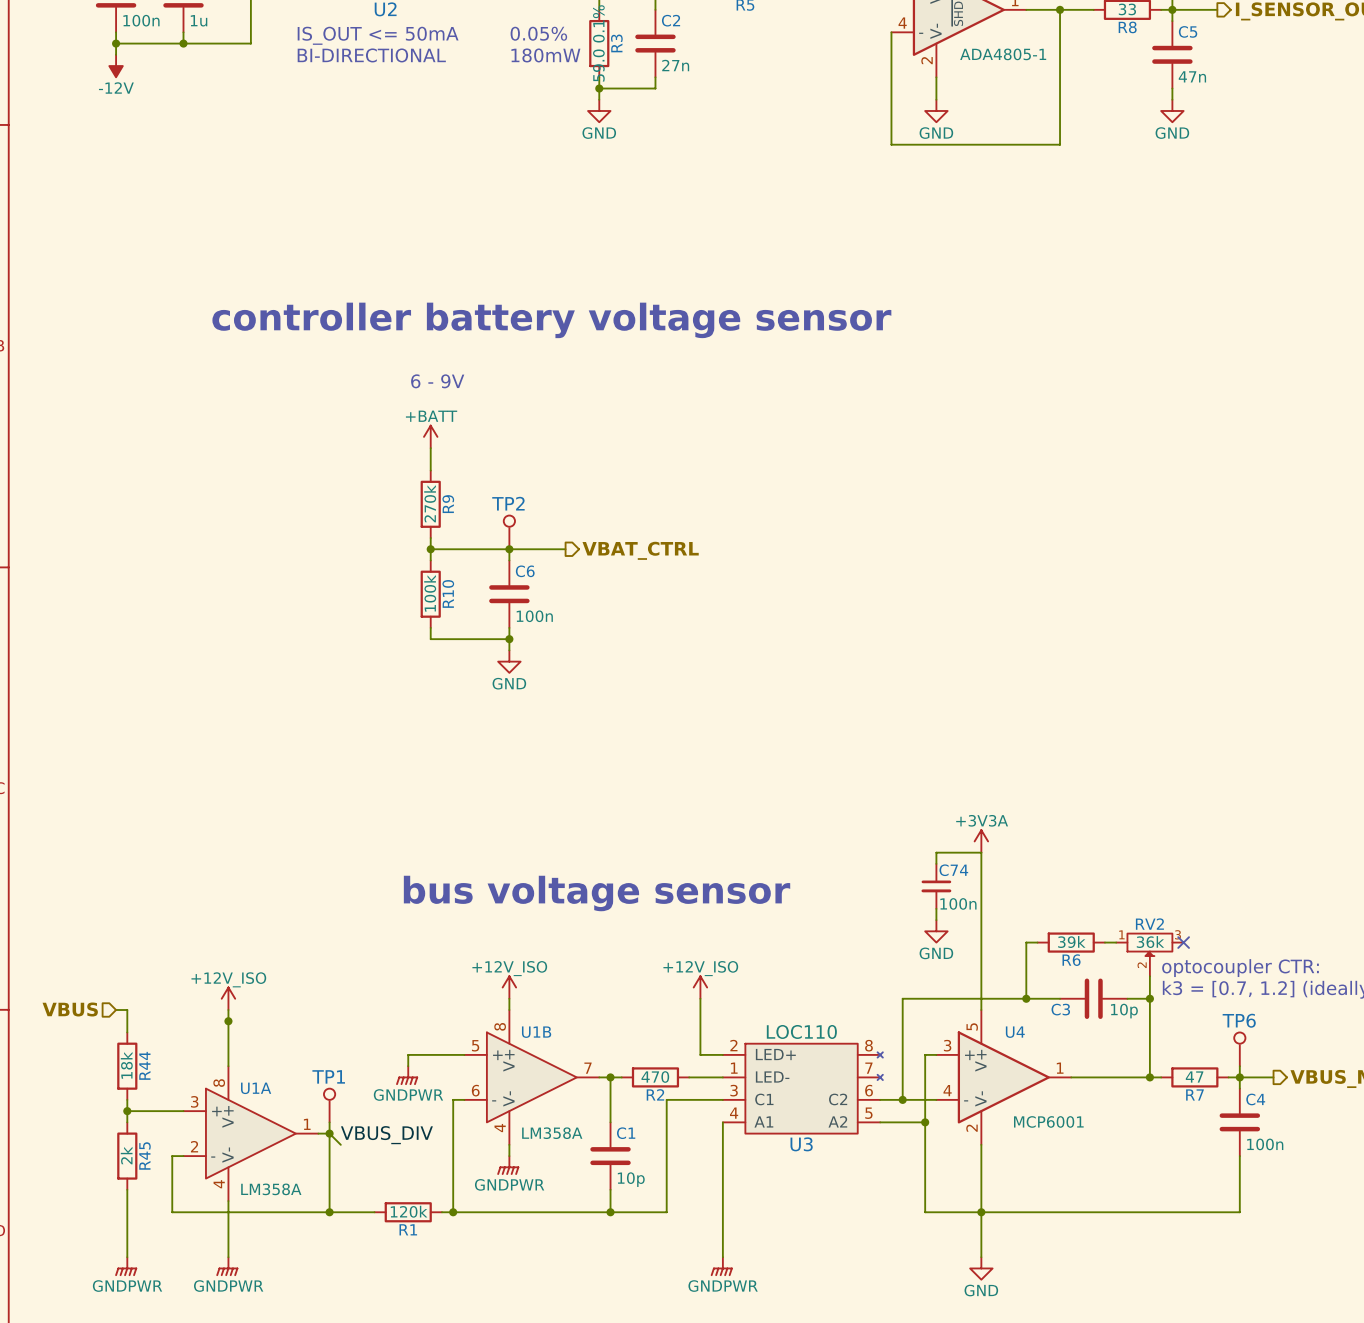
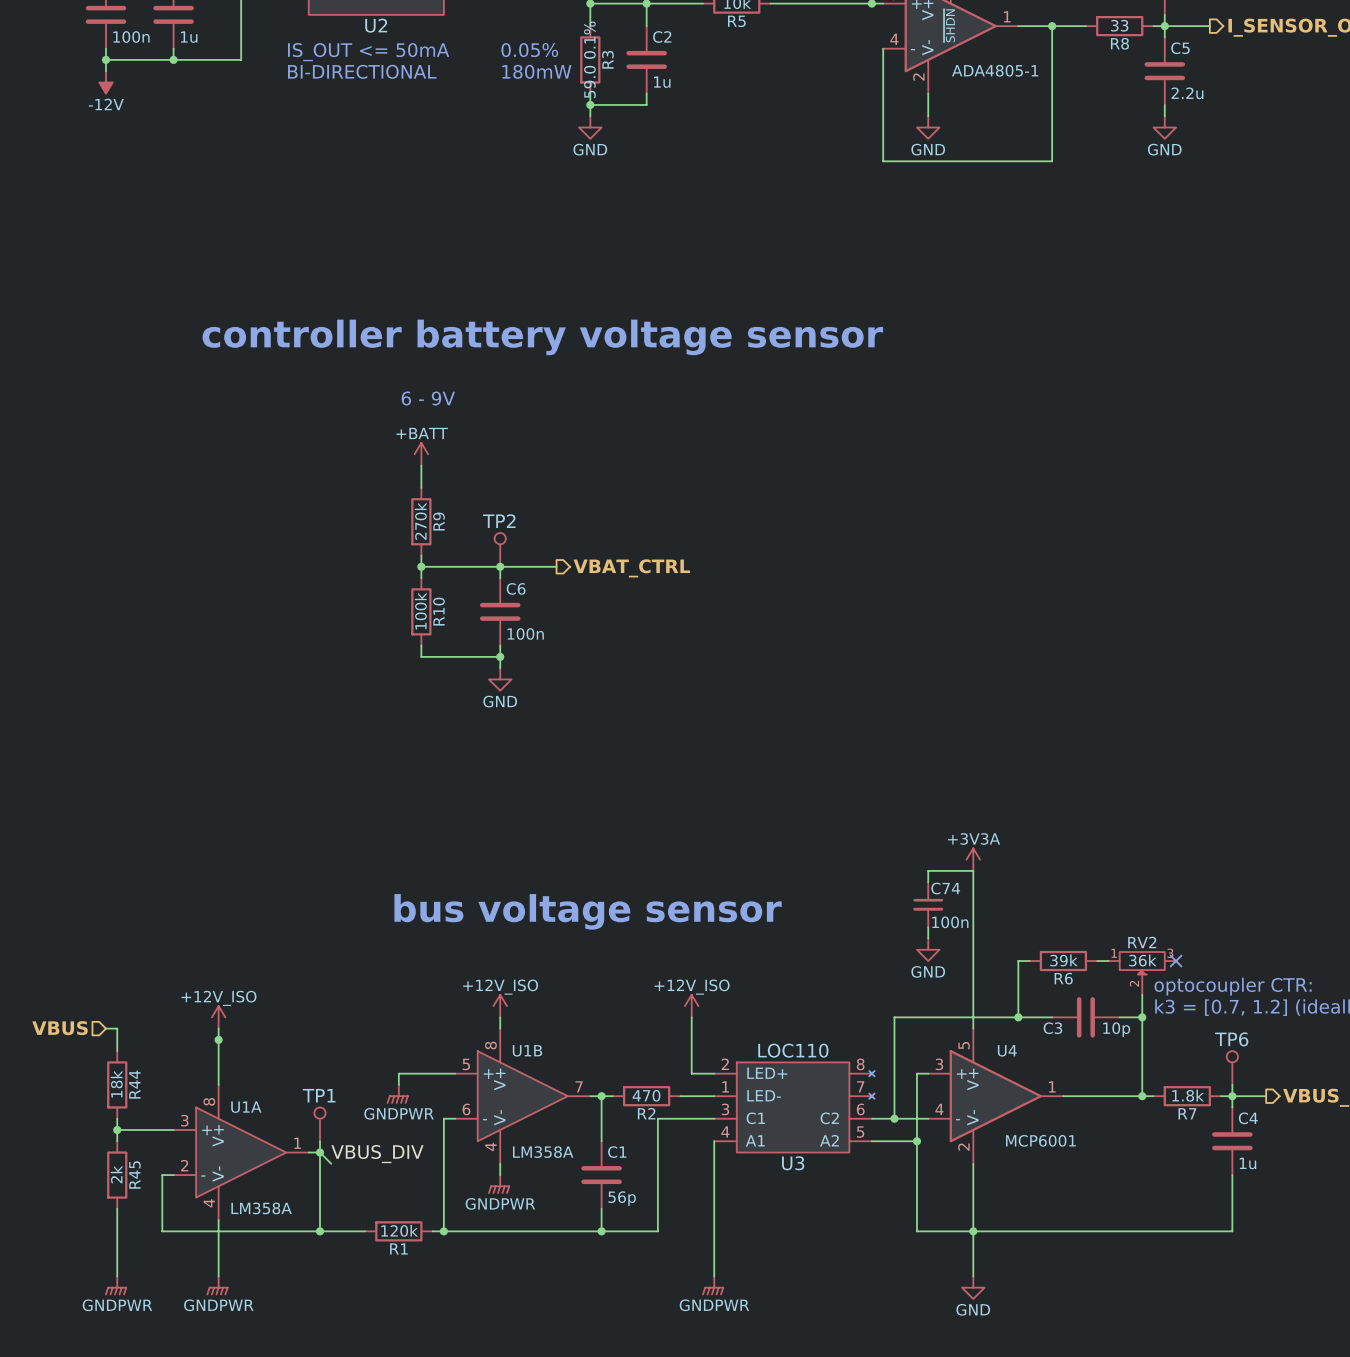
C2 value: 27n (675, 65) -> 1u (662, 82)
C5 value: 47n (1192, 76) -> 2.2u (1187, 93)
R7 value: 47 (1194, 1077) -> 1.8k (1188, 1095)
C4 value: 100n (1265, 1144) -> 1u (1247, 1163)
C1 value: 10p (631, 1179) -> 56p (622, 1198)

